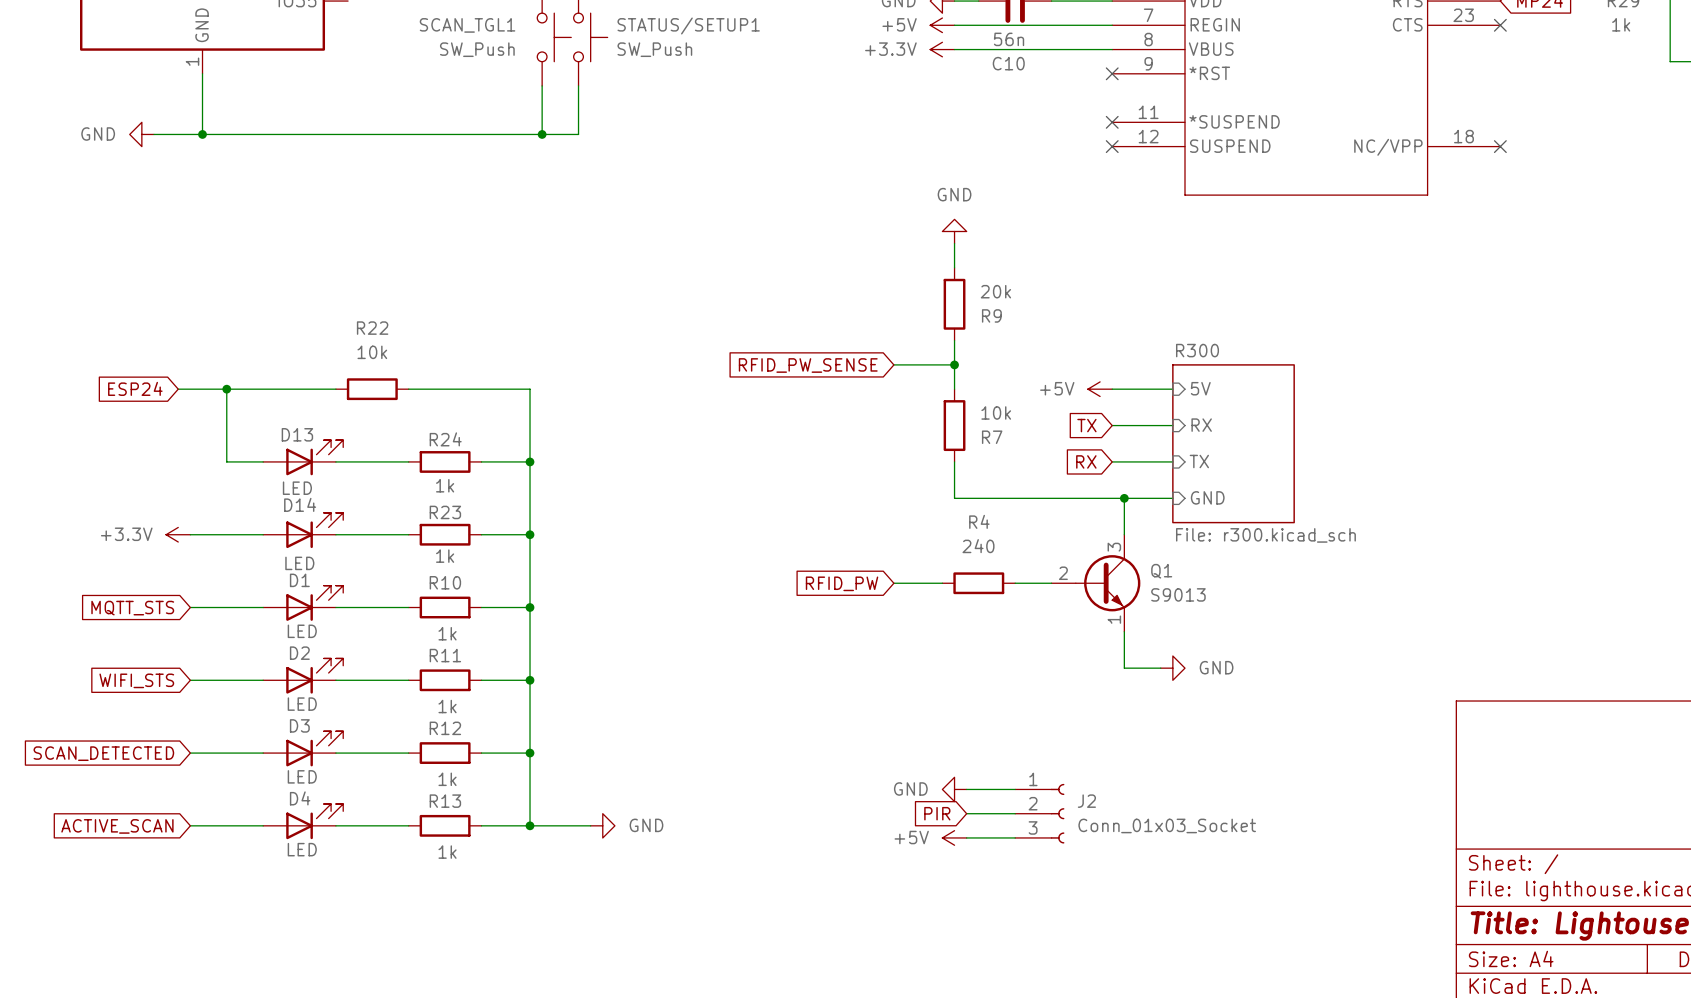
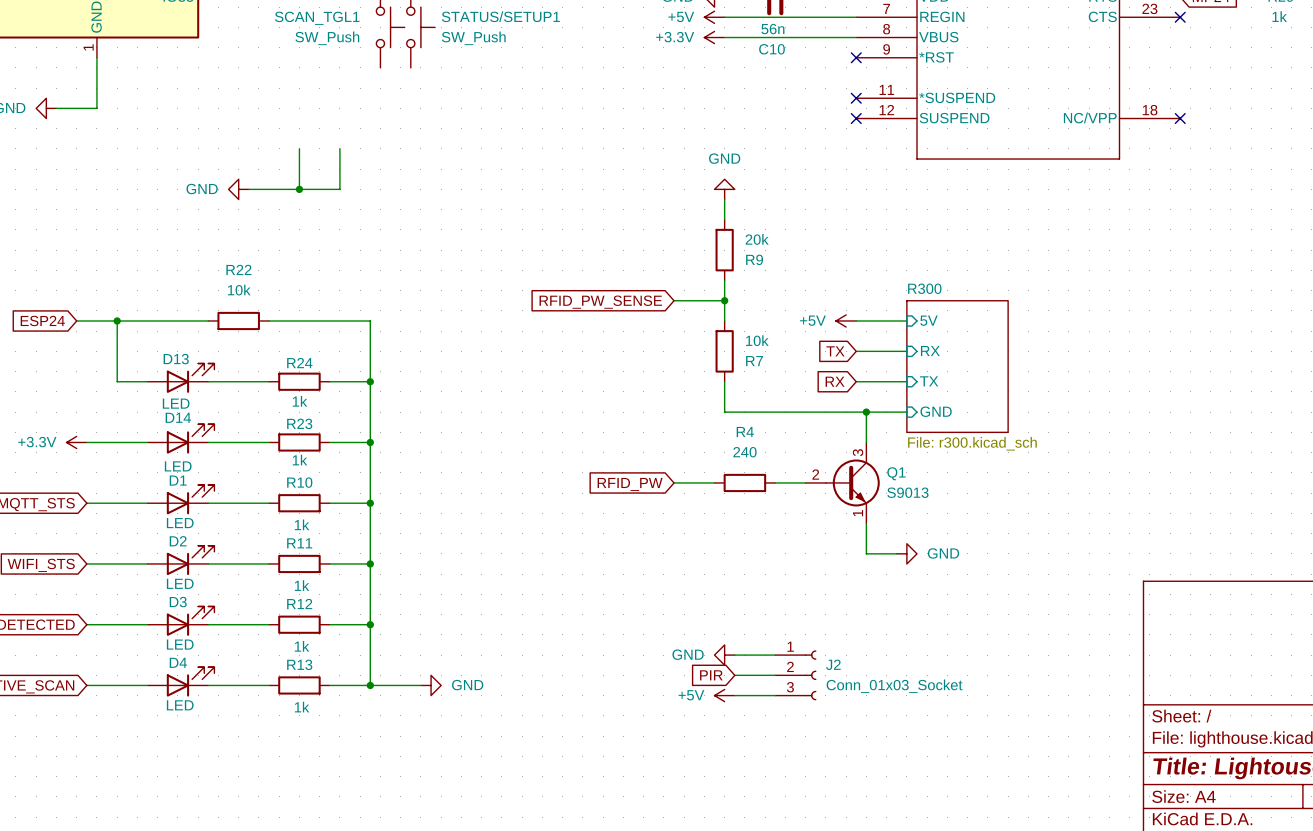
wire: (542, 85) (542, 134) -> (299, 148) (299, 189)
wire: (578, 85) (578, 134) (202, 134) -> none
junction: (202, 134) -> none
junction: (542, 134) -> none
wire: none -> (339, 148) (339, 189) (248, 189)
power symbol: none -> GND (238, 189)
junction: none -> (299, 189)

